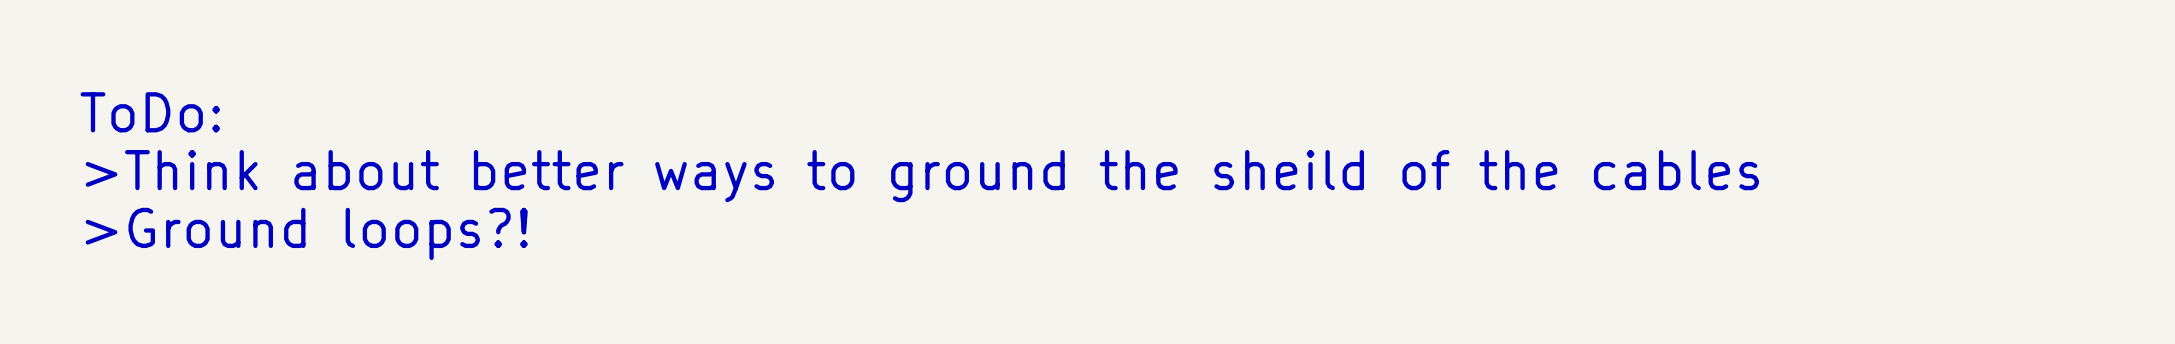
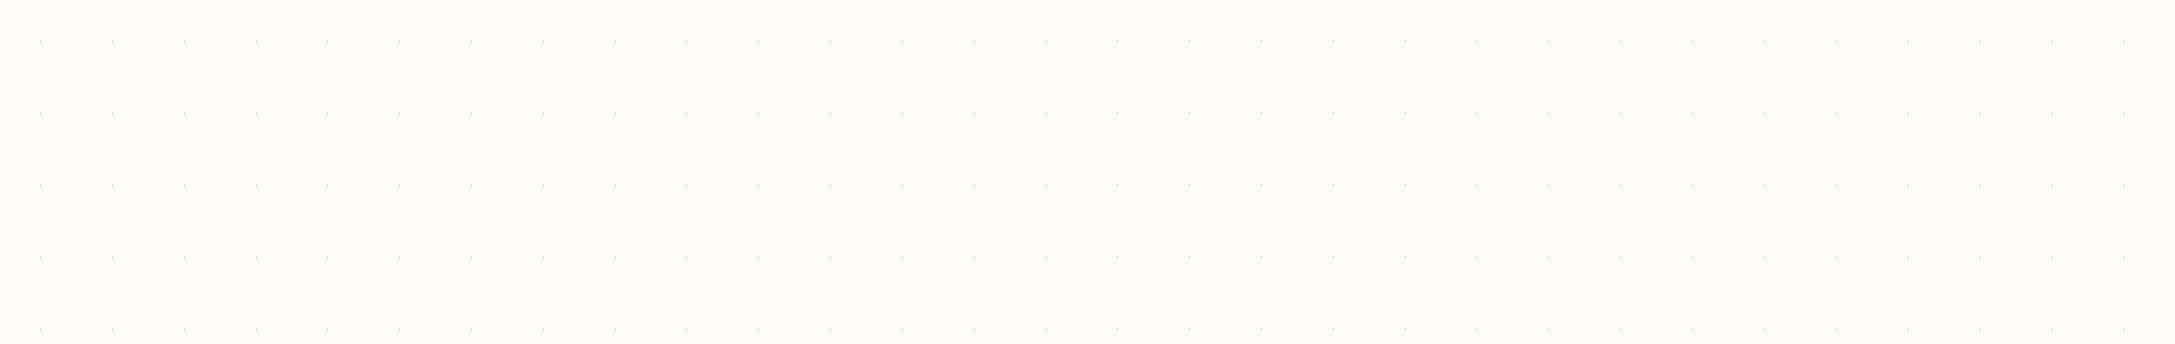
text: ToDo: (150, 112) -> none
text: >Think about better ways to ground the sheild of the cables (922, 176) -> none
text: >Ground loops?! (306, 233) -> none

